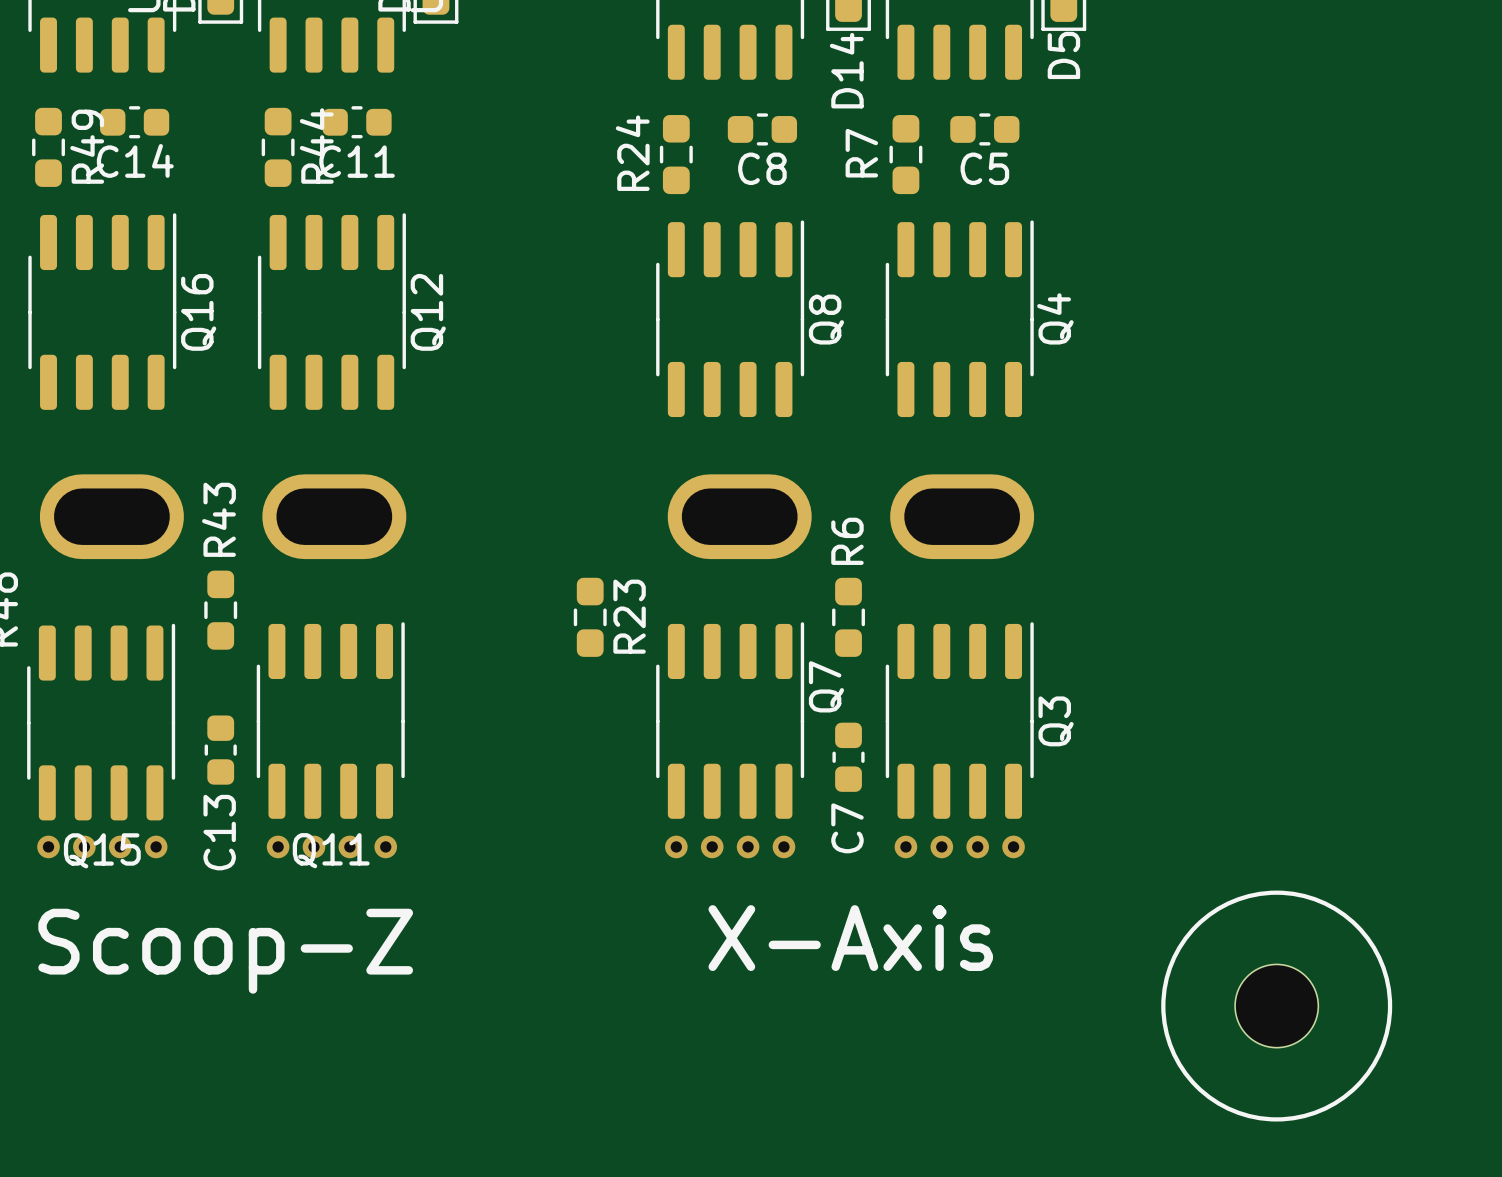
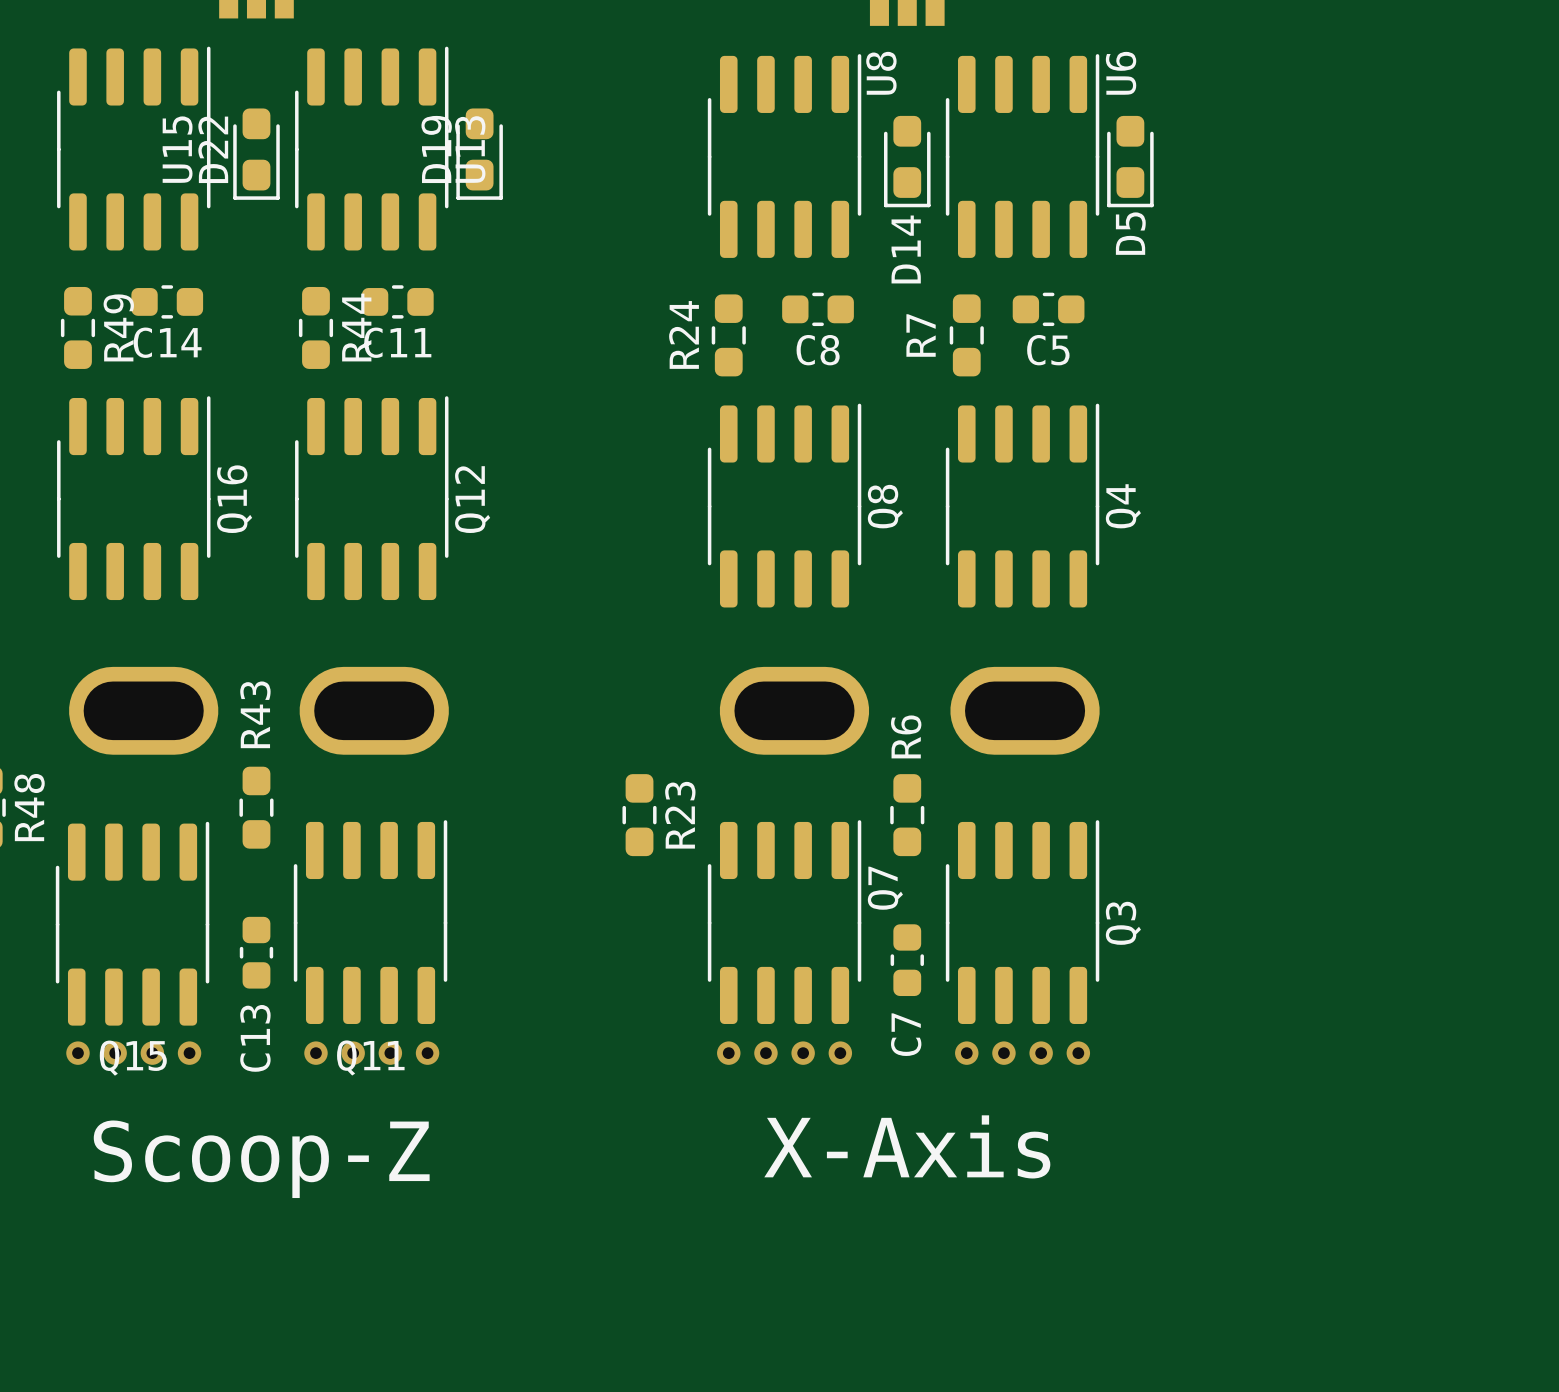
part: (1276, 1006) -> none

